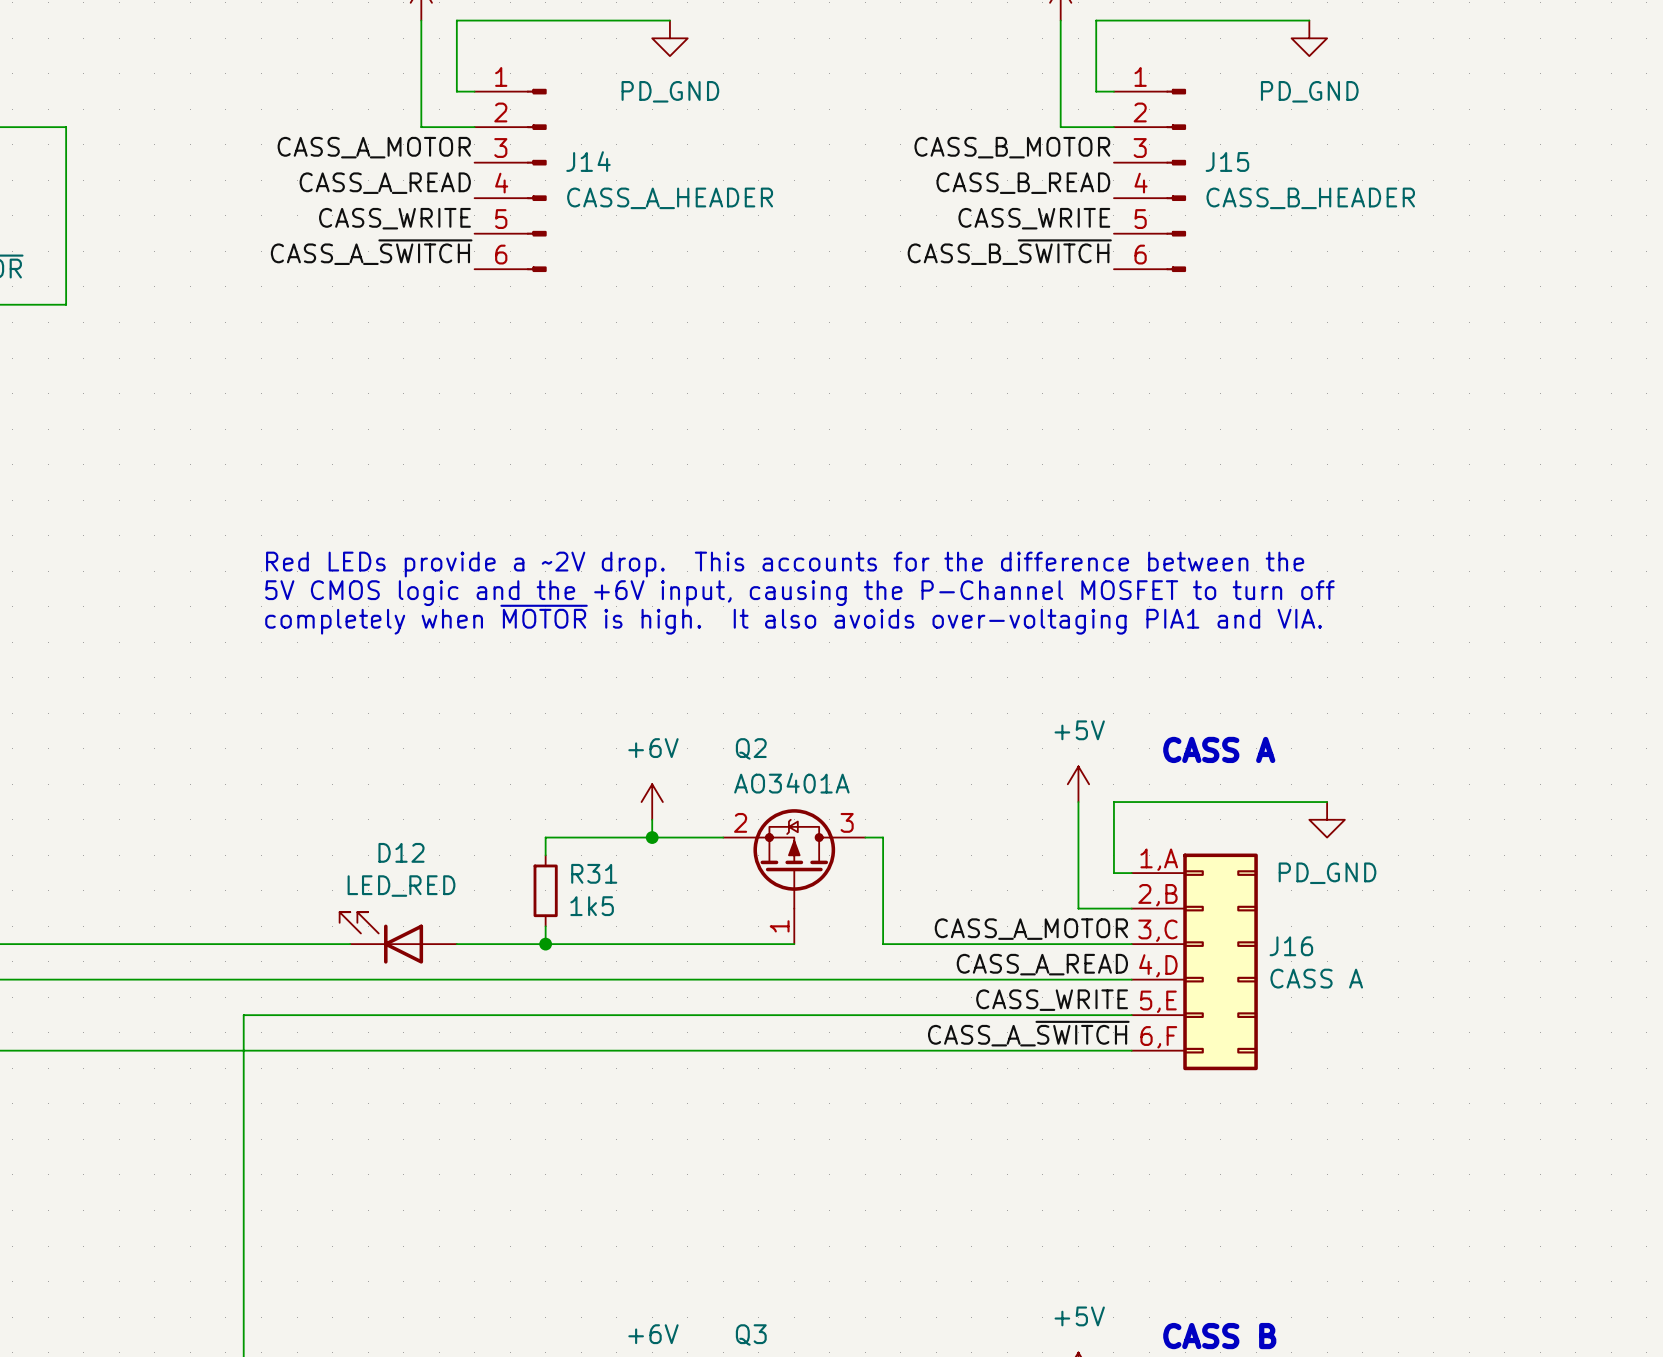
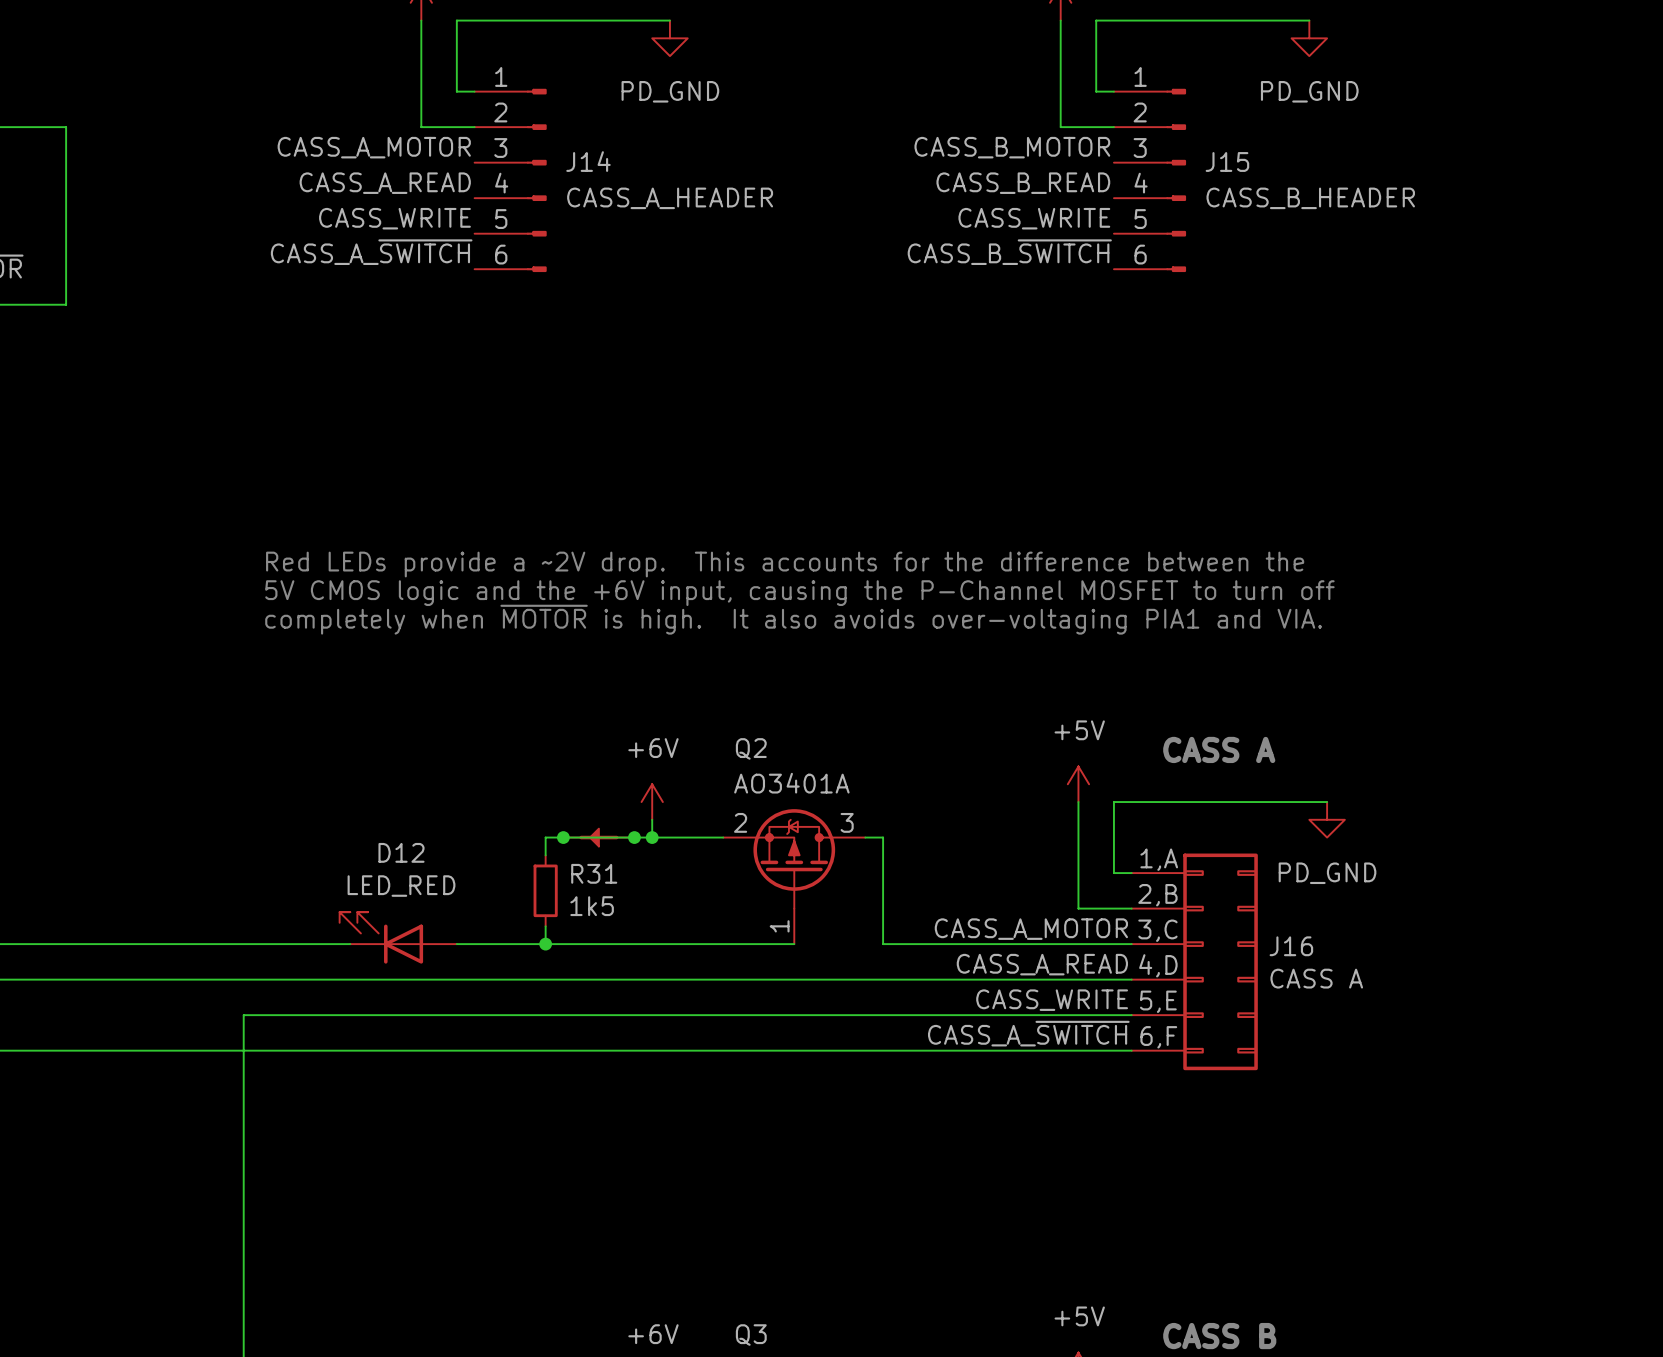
junction: none -> (563, 837)
part: none -> (598, 837)
junction: none -> (634, 837)

